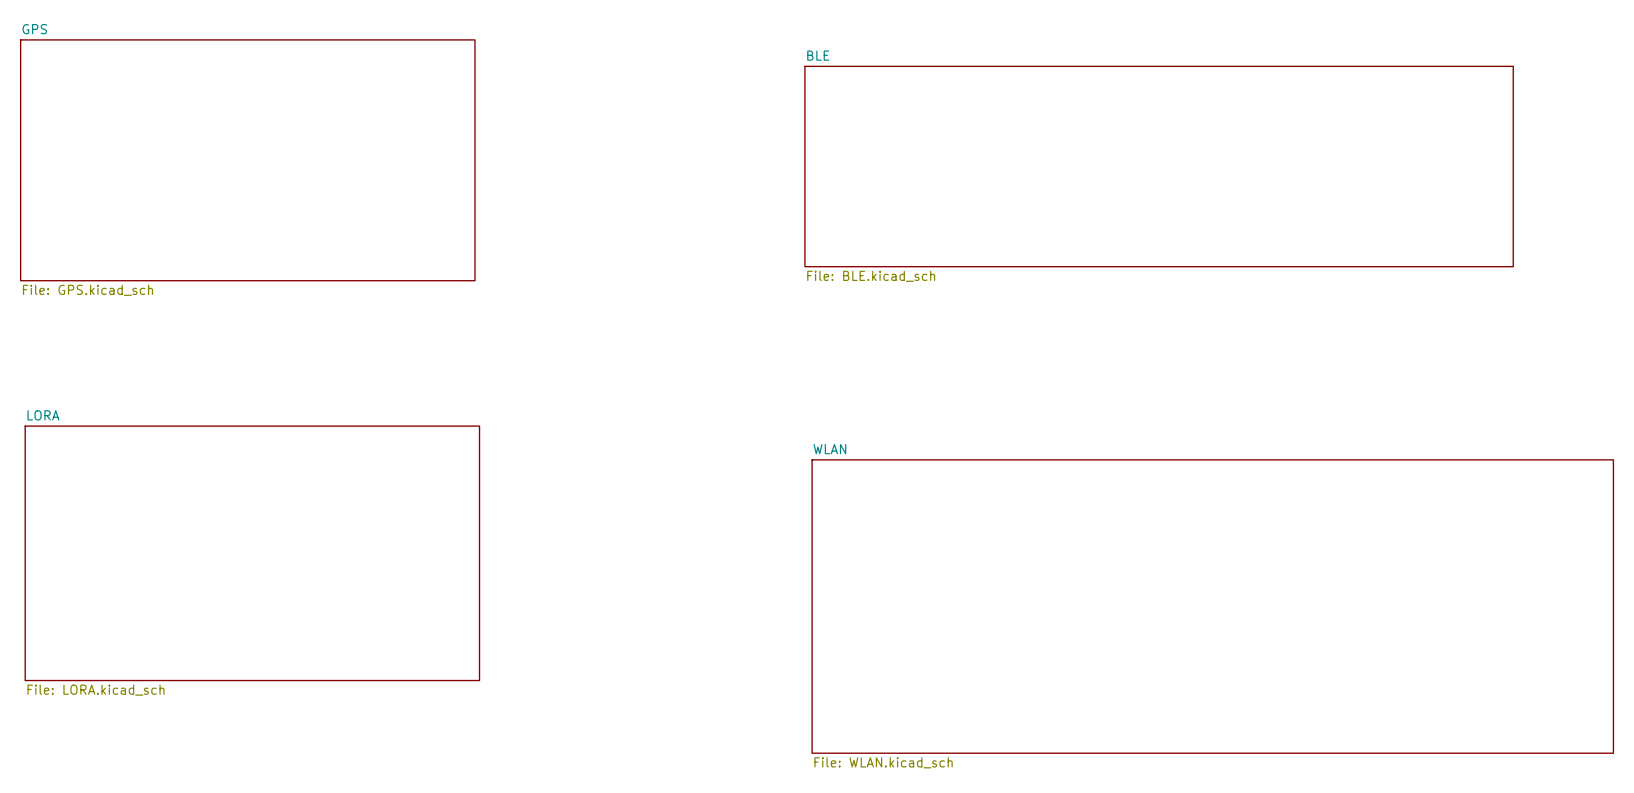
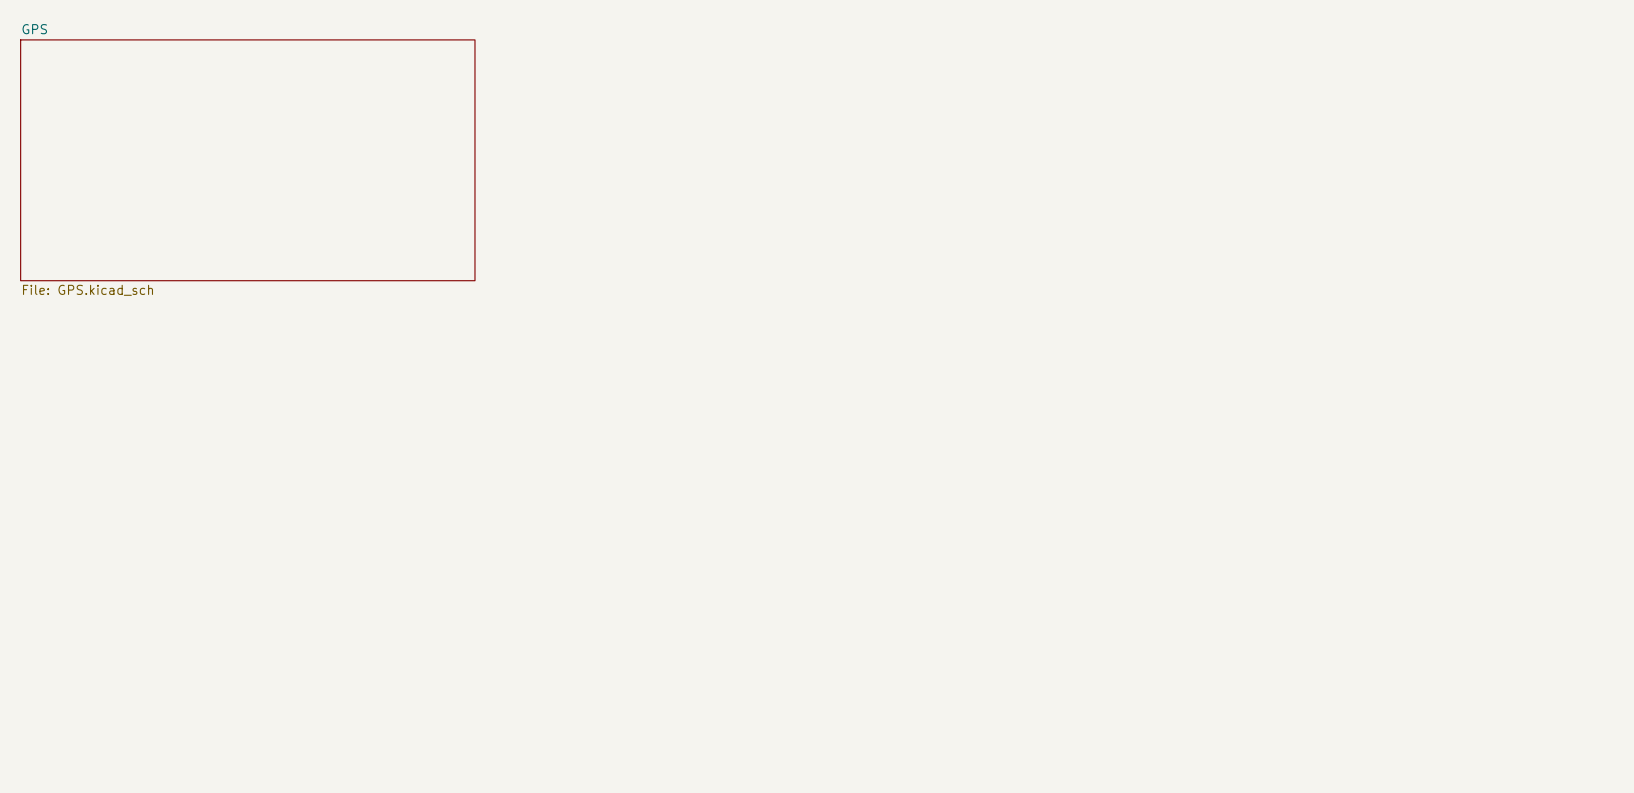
sheet BLE: File: BLE.kicad_sch (1159, 166) -> none
sheet LORA: File: LORA.kicad_sch (252, 553) -> none
sheet WLAN: File: WLAN.kicad_sch (1212, 606) -> none

